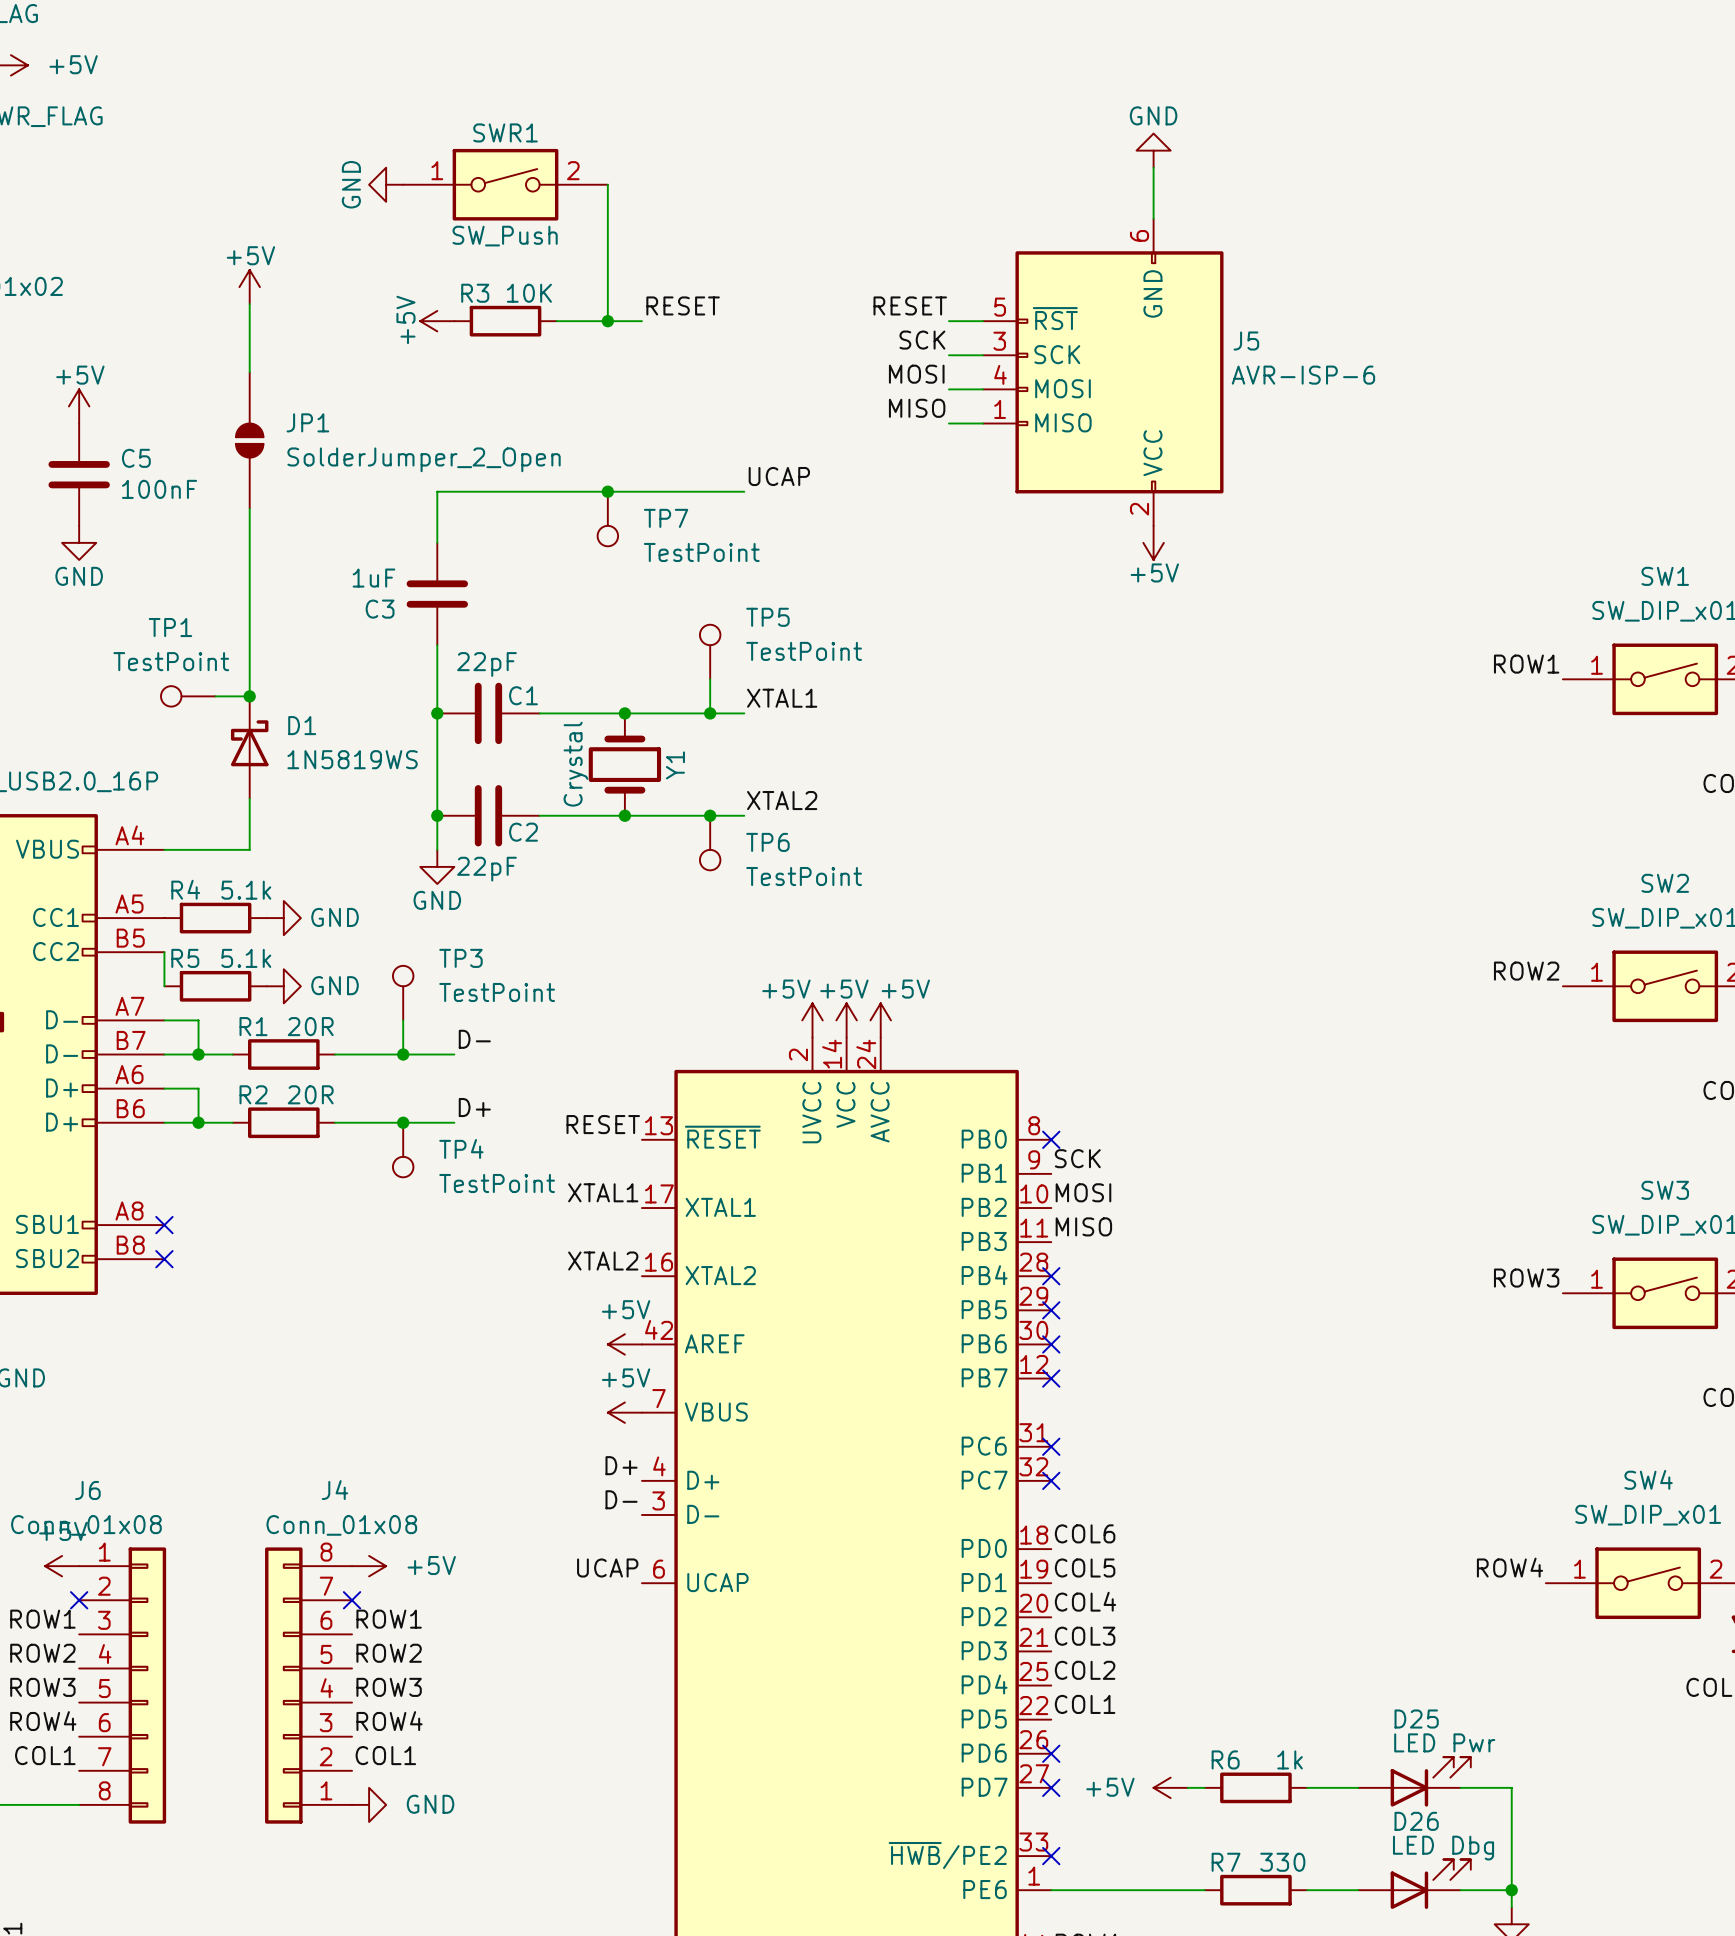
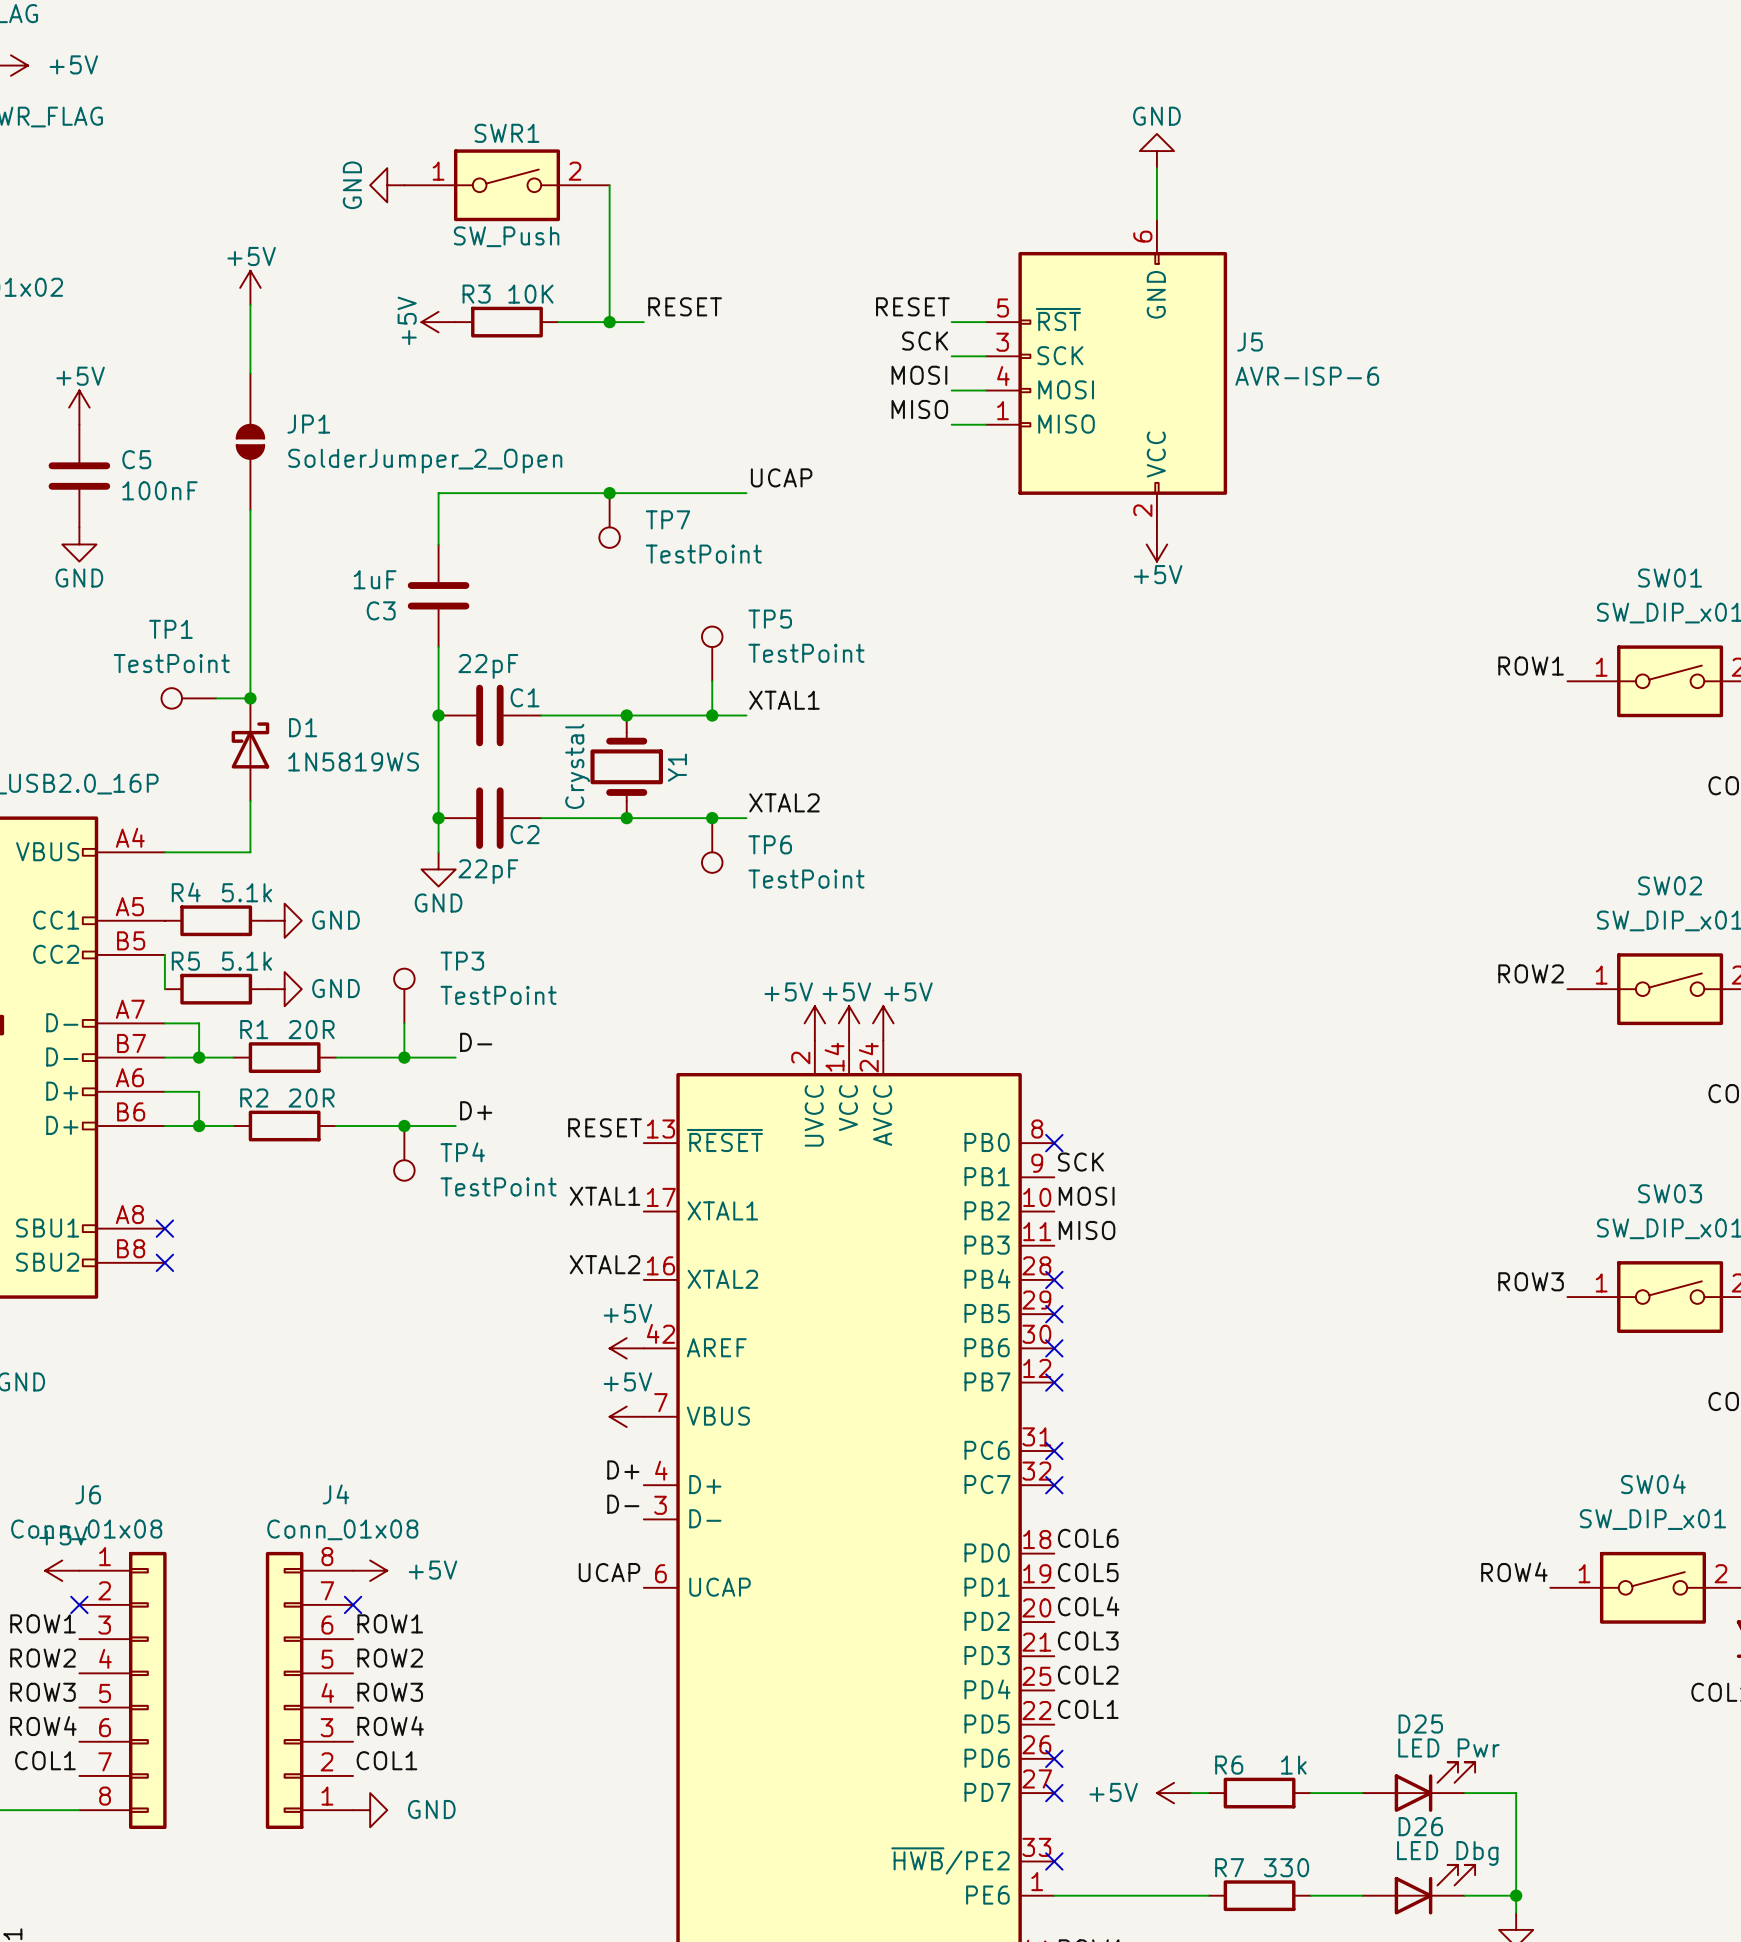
SW1 name: SW1 (1665, 576) -> SW01 (1670, 578)
SW2 name: SW2 (1665, 883) -> SW02 (1670, 885)
SW3 name: SW3 (1665, 1190) -> SW03 (1670, 1193)
SW4 name: SW4 (1648, 1479) -> SW04 (1653, 1484)

